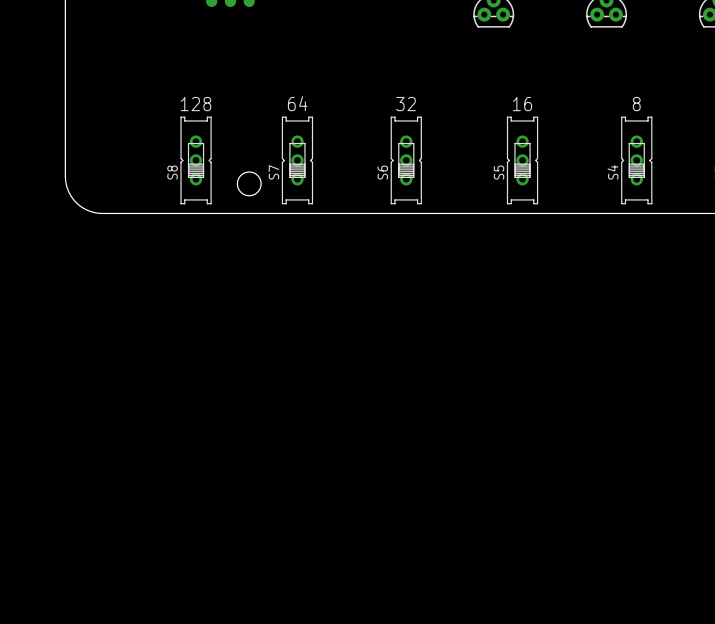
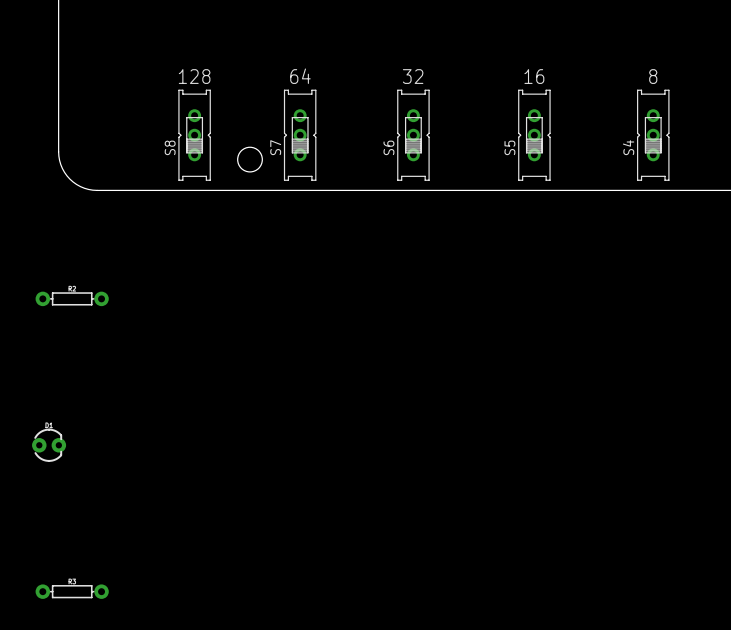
part: none -> (72, 298)
part: none -> (49, 445)
part: none -> (72, 591)

